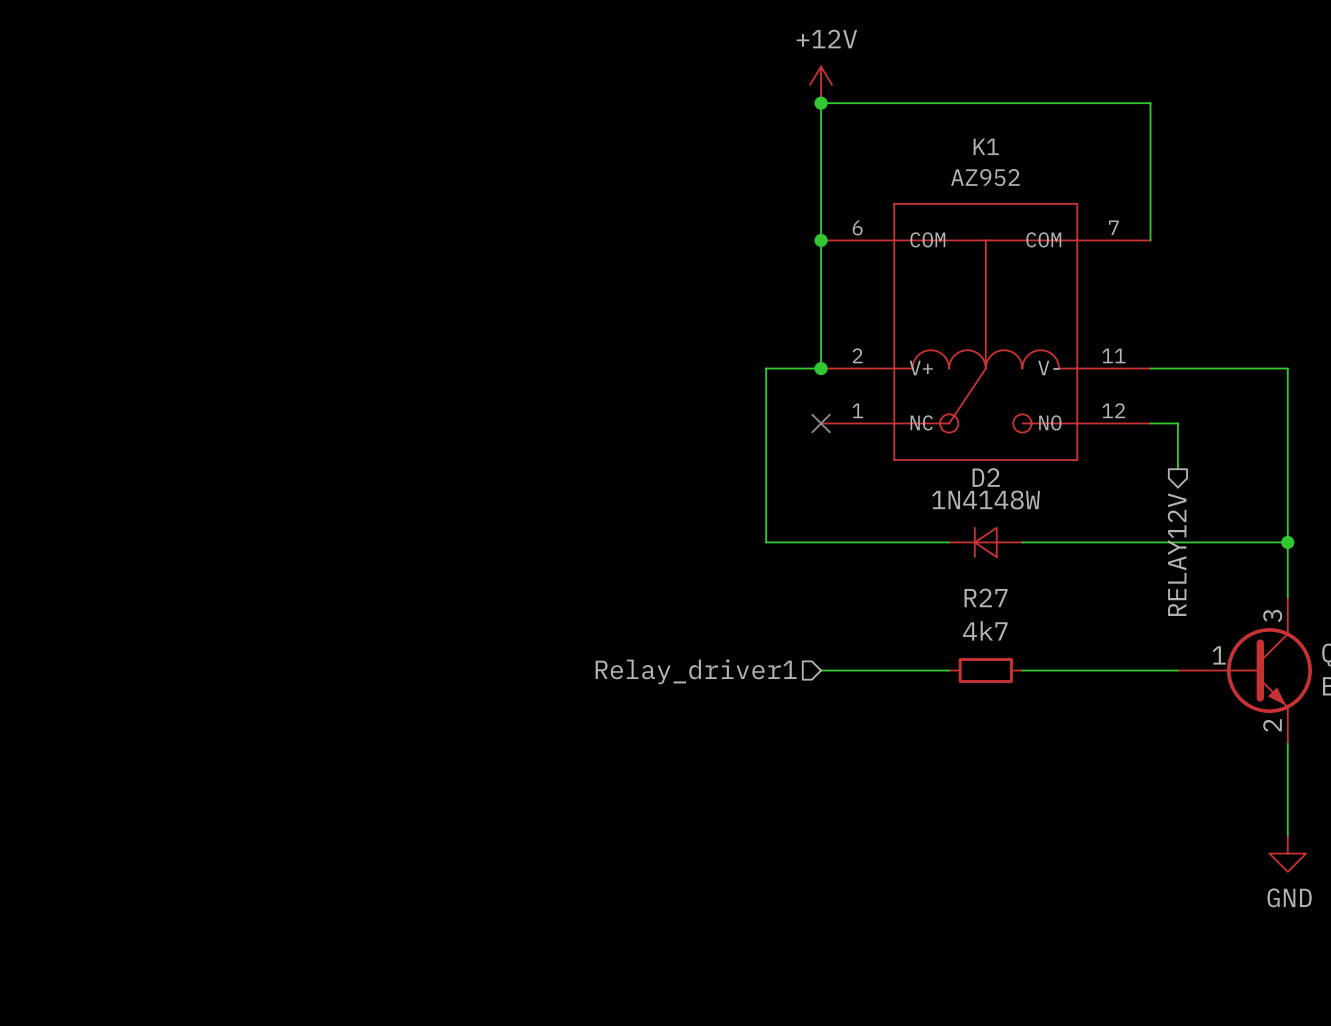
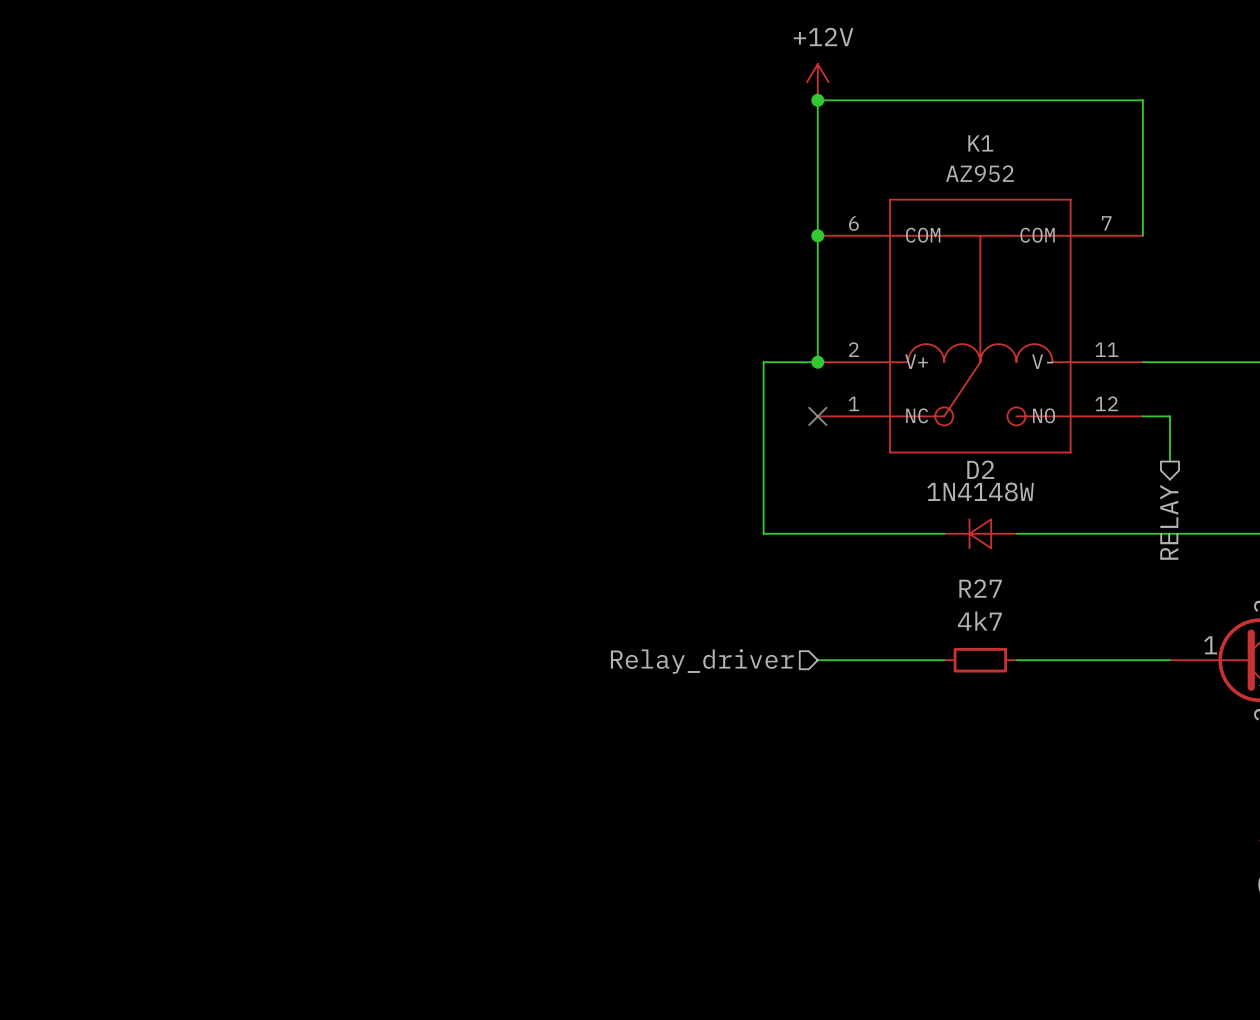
hierarchical label: RELAY12V (1177, 554) -> RELAY (1169, 522)
hierarchical label: Relay_driver1 (696, 671) -> Relay_driver (702, 661)

